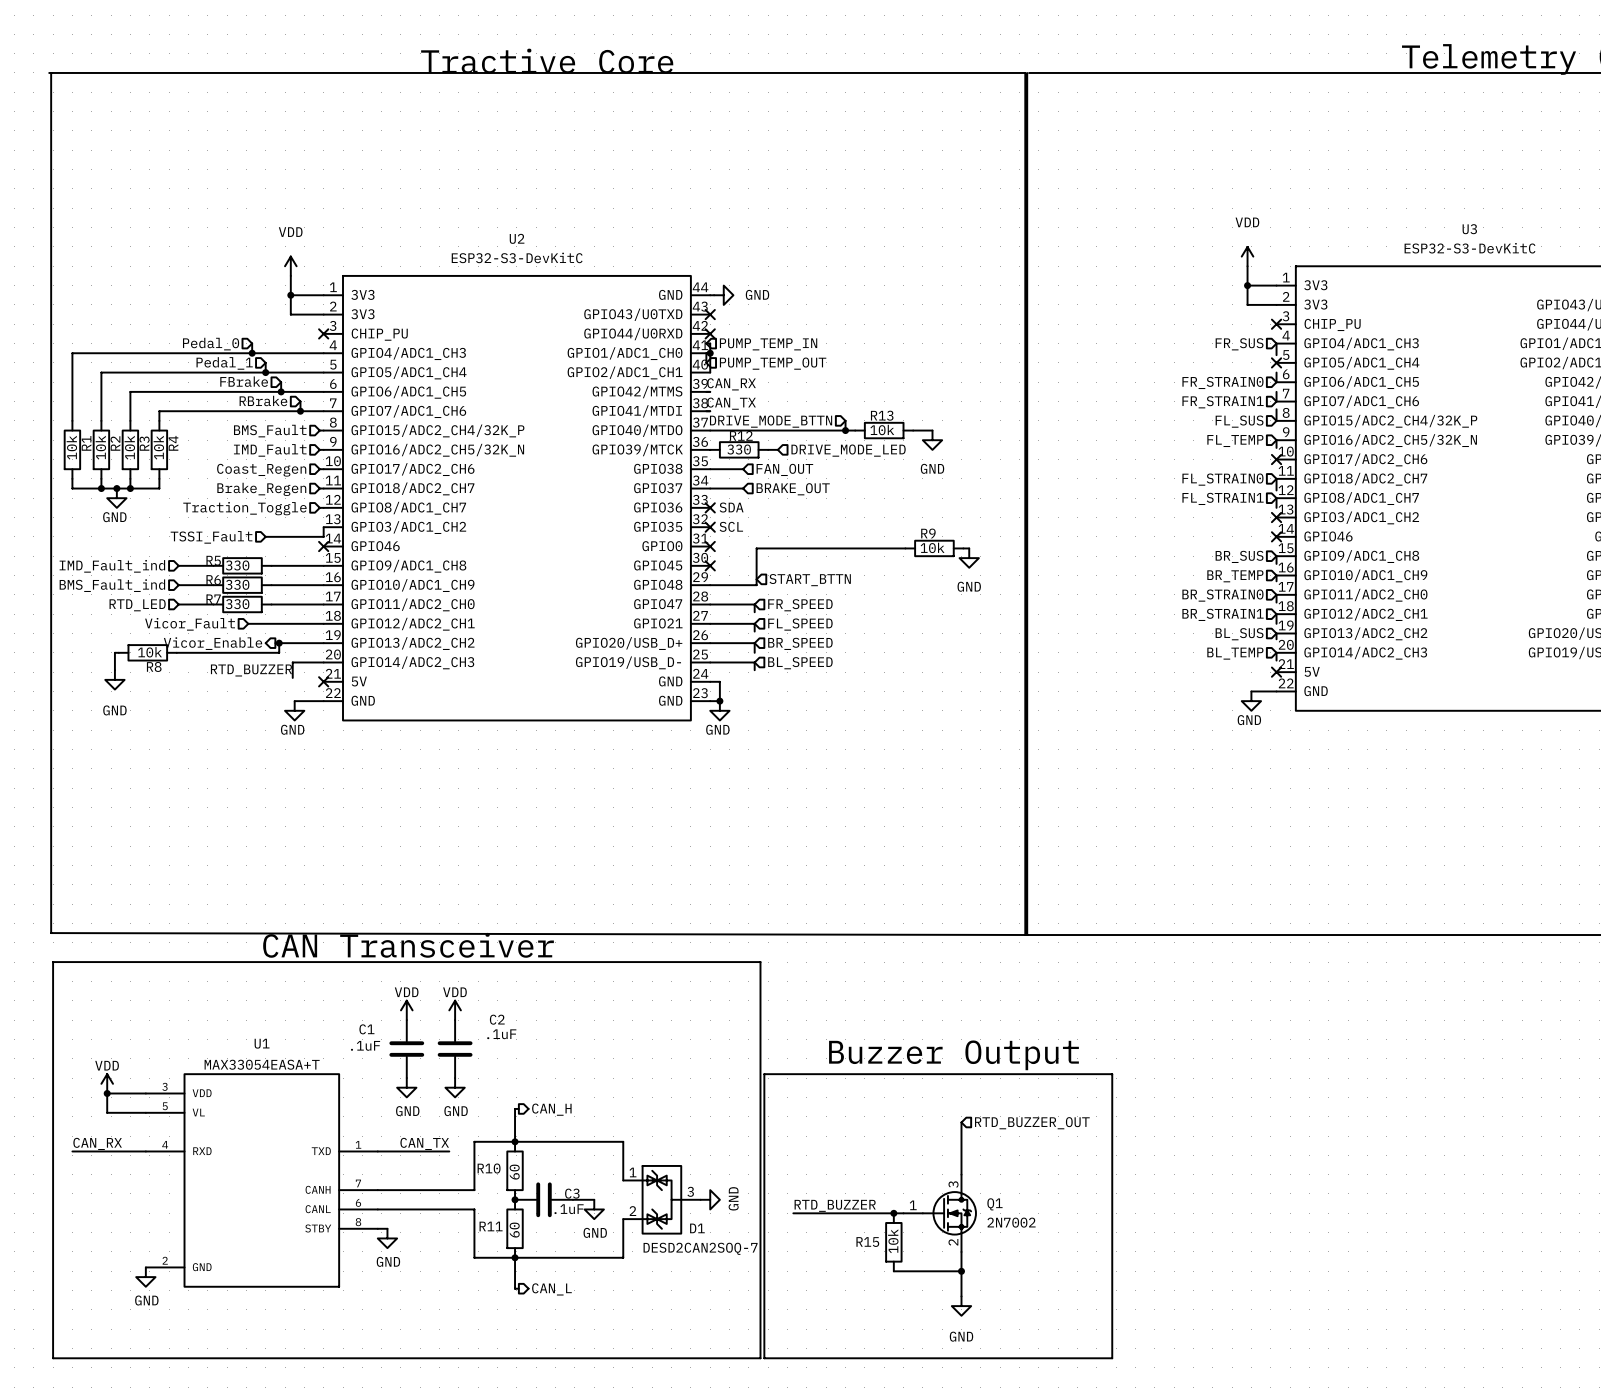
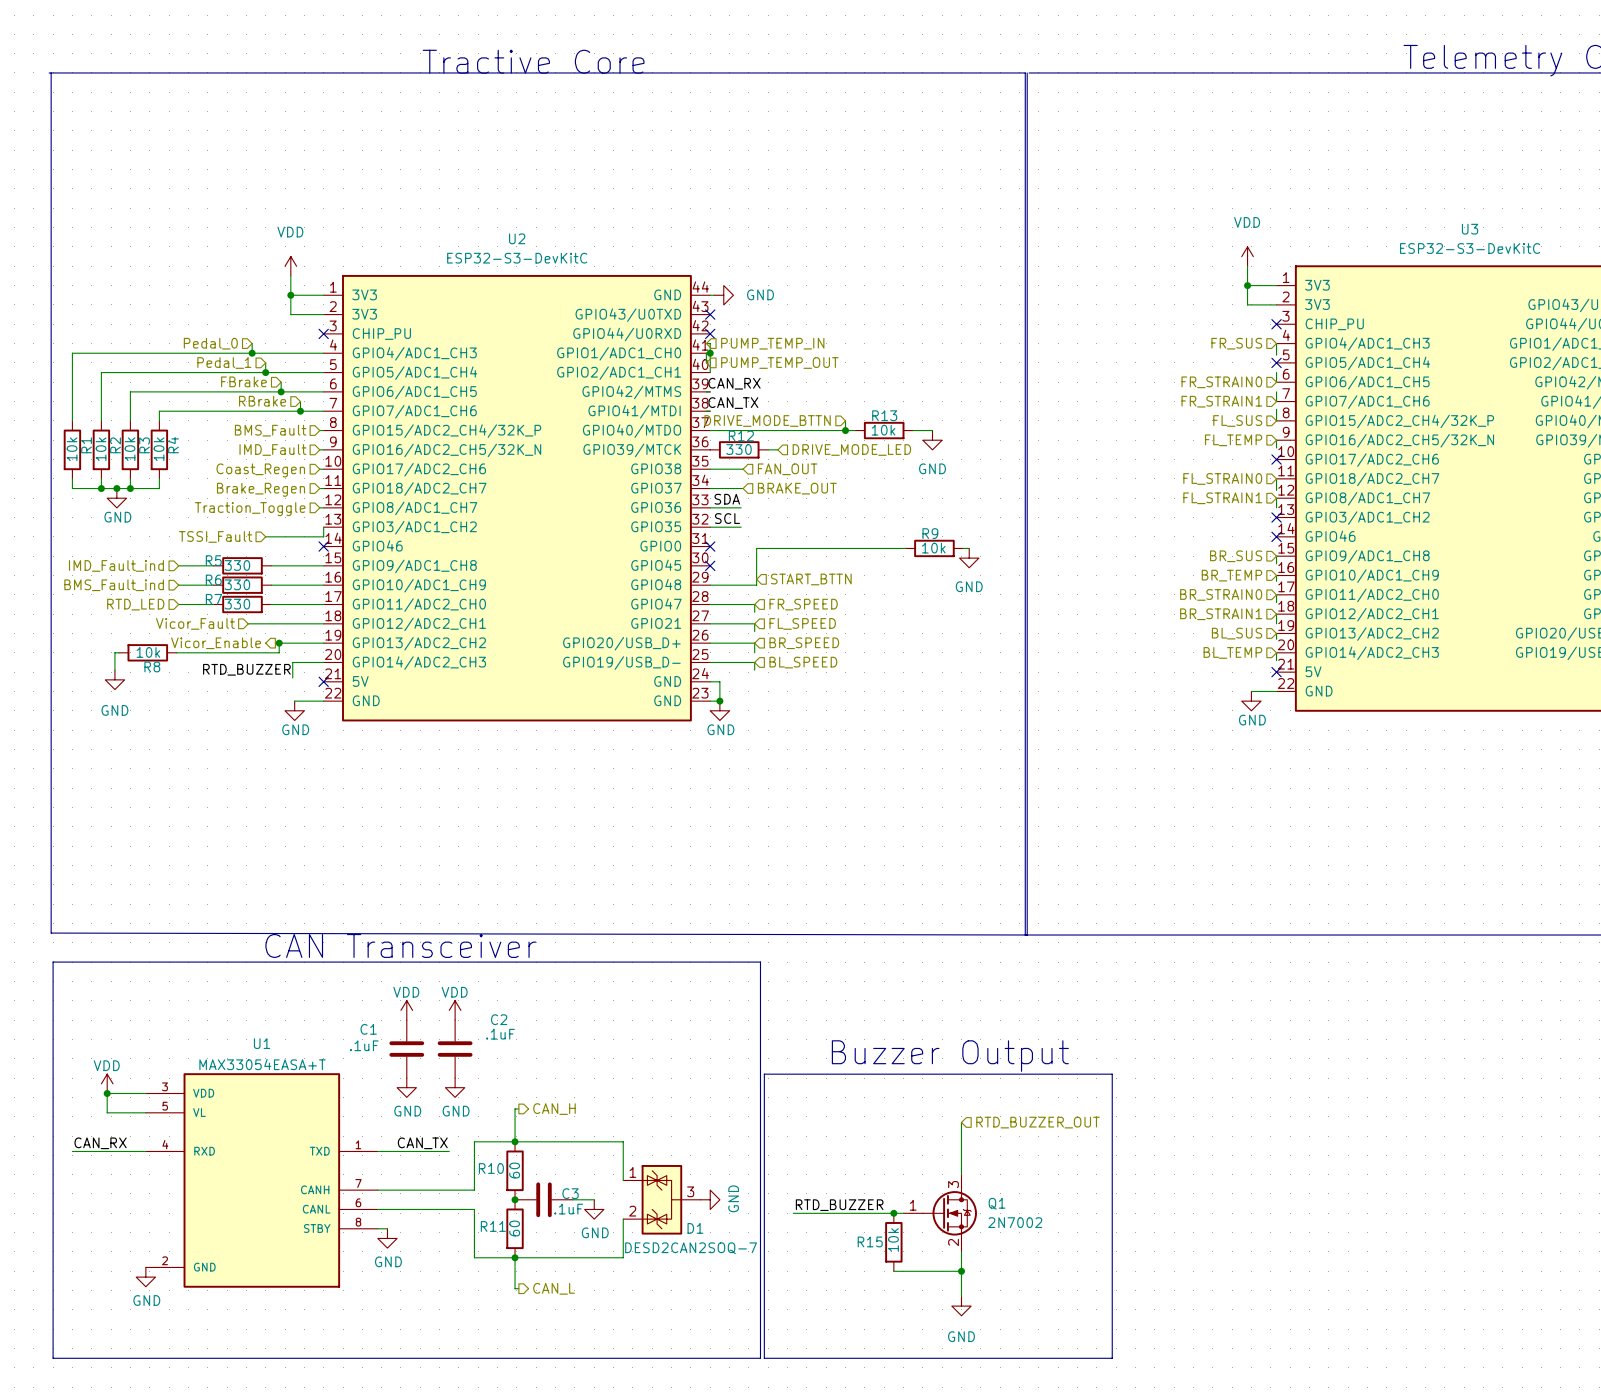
label: none -> SDA (727, 499)
wire: none -> (710, 507) (741, 507)
no-connect mark: (710, 507) -> none
text: SDA (731, 507) -> none
label: none -> SCL (727, 518)
text: SCL (731, 526) -> none
wire: none -> (710, 527) (741, 527)
no-connect mark: (710, 527) -> none

